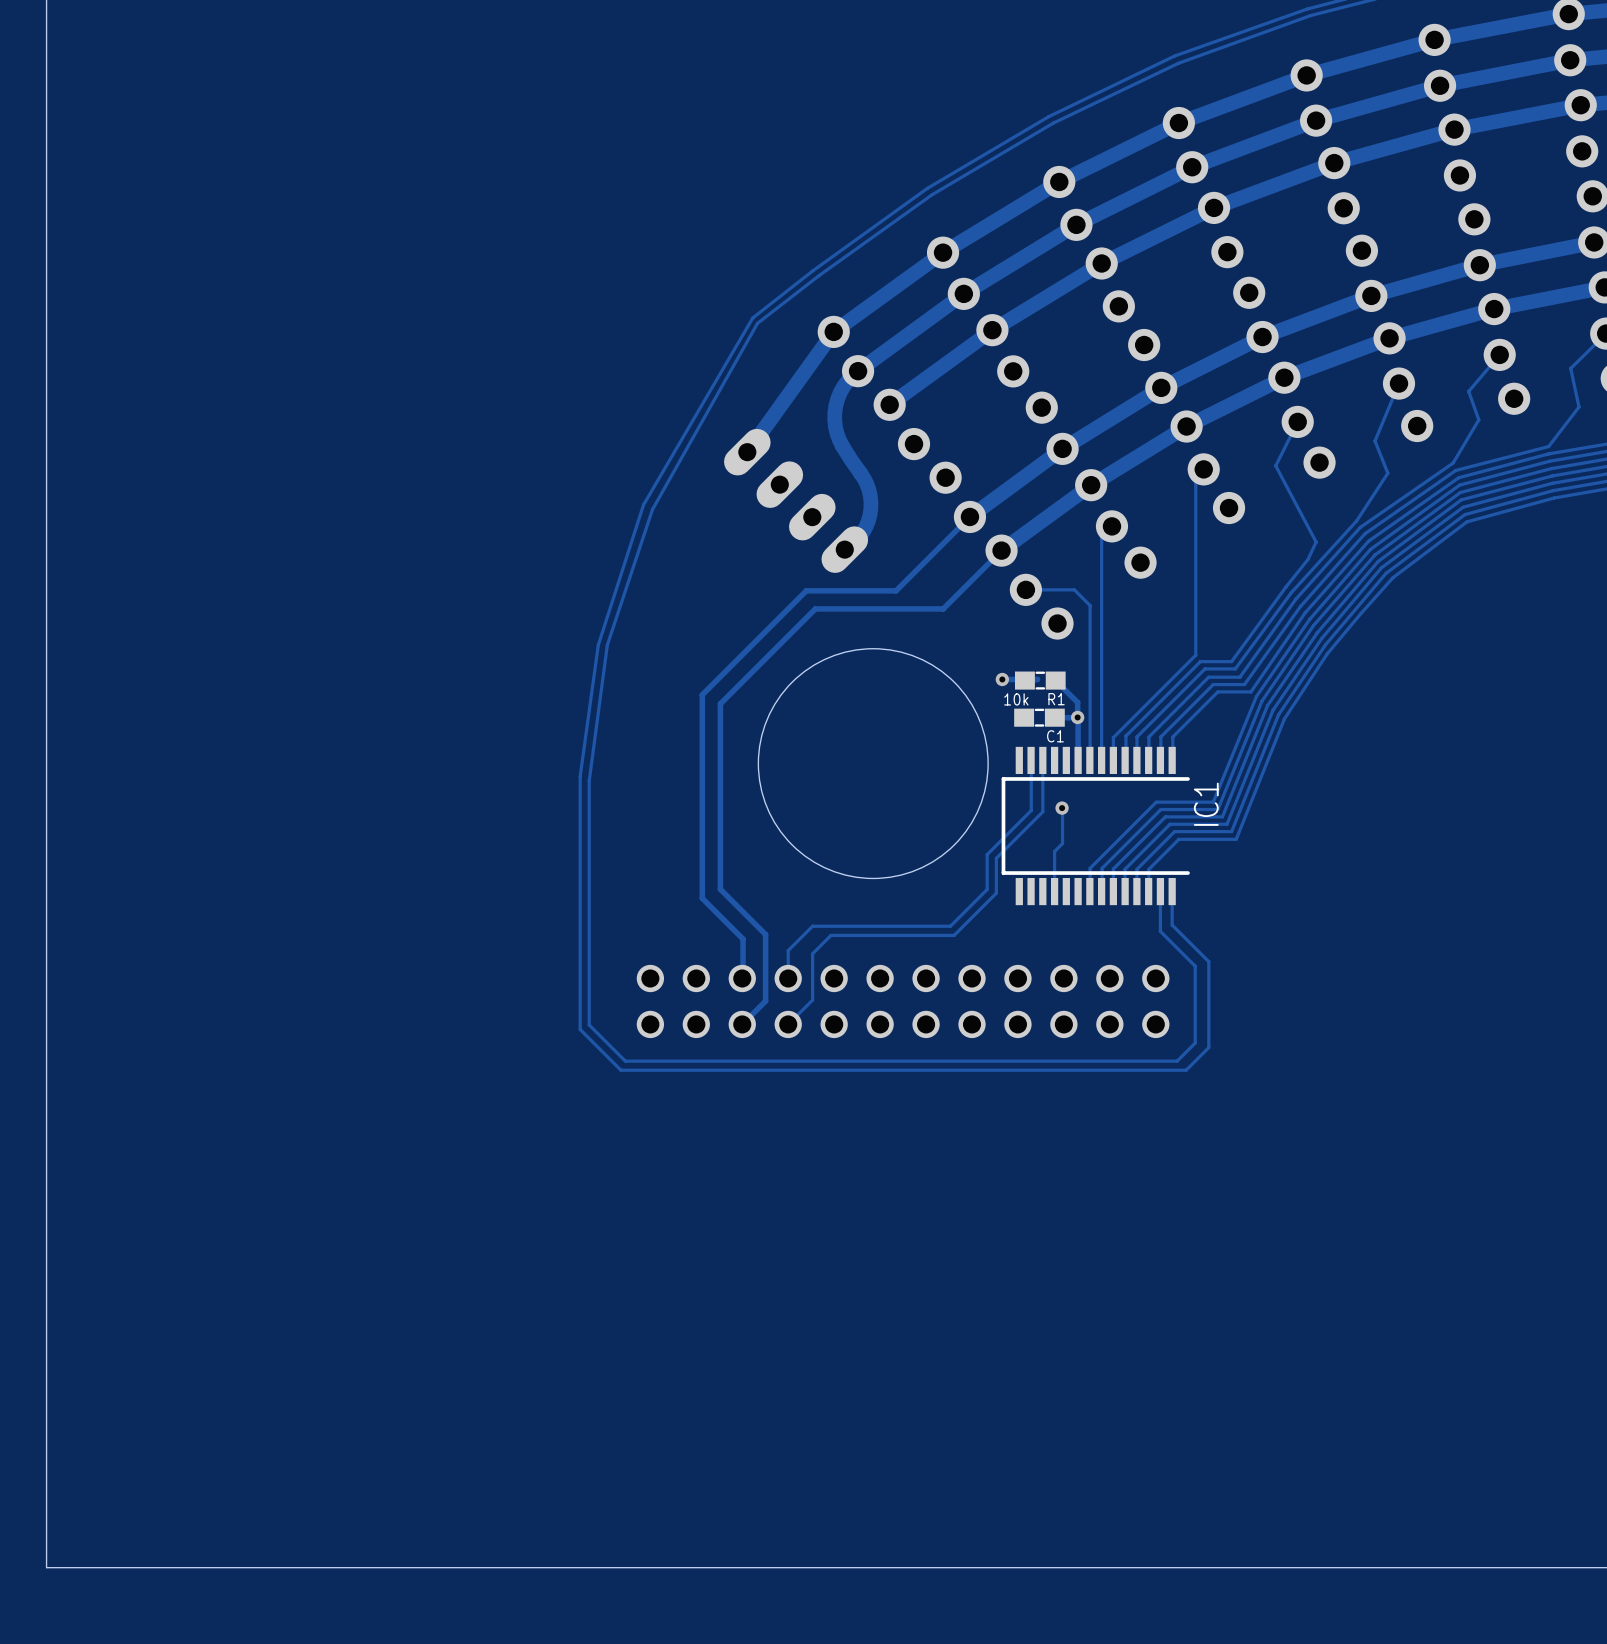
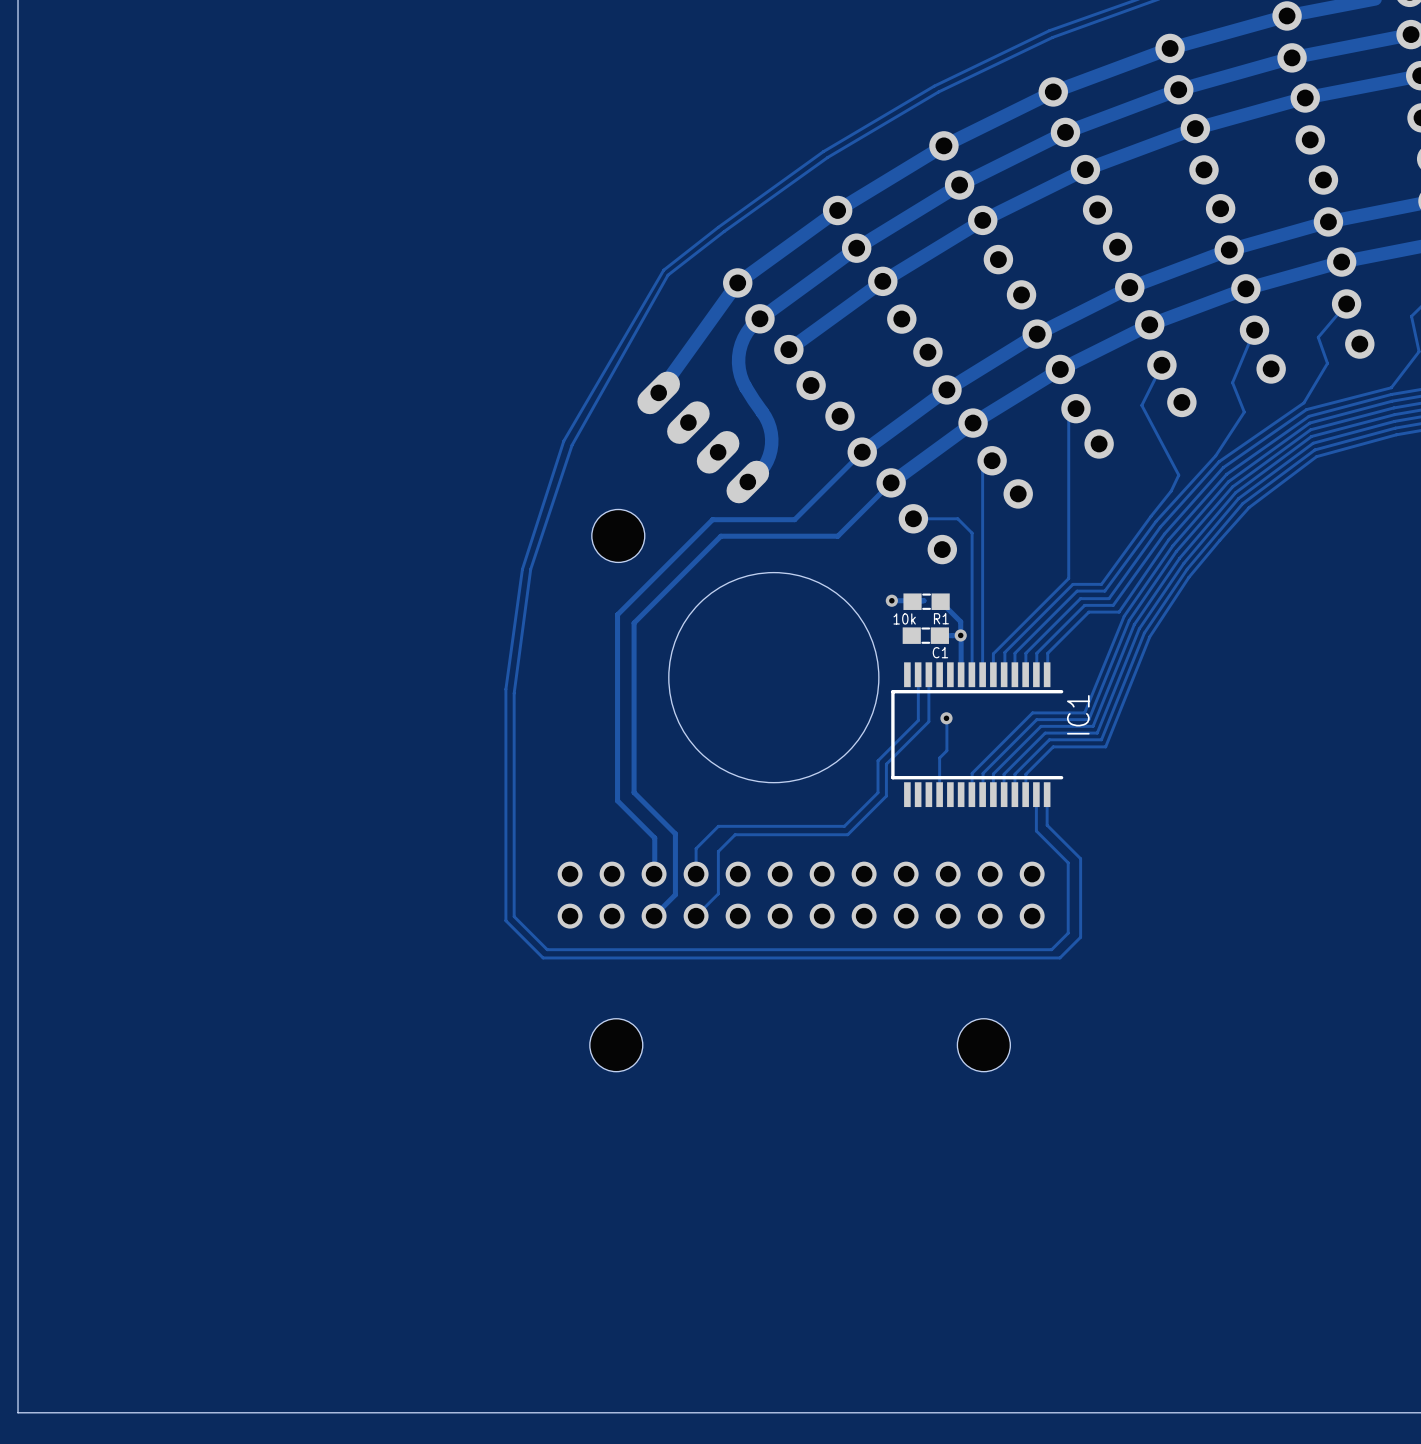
hole: none -> (618, 535)
hole: none -> (616, 1045)
hole: none -> (983, 1045)

